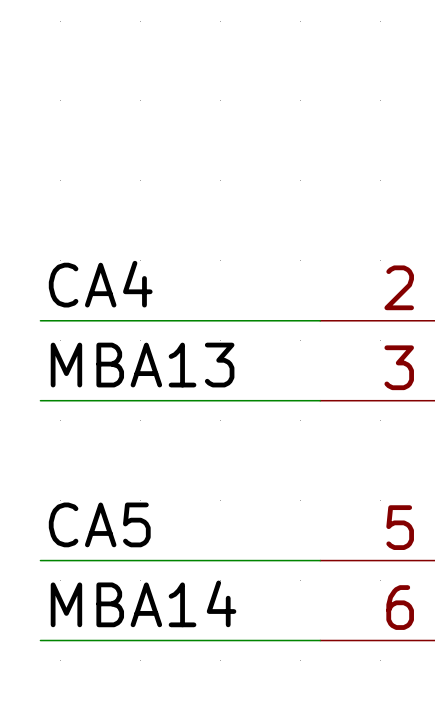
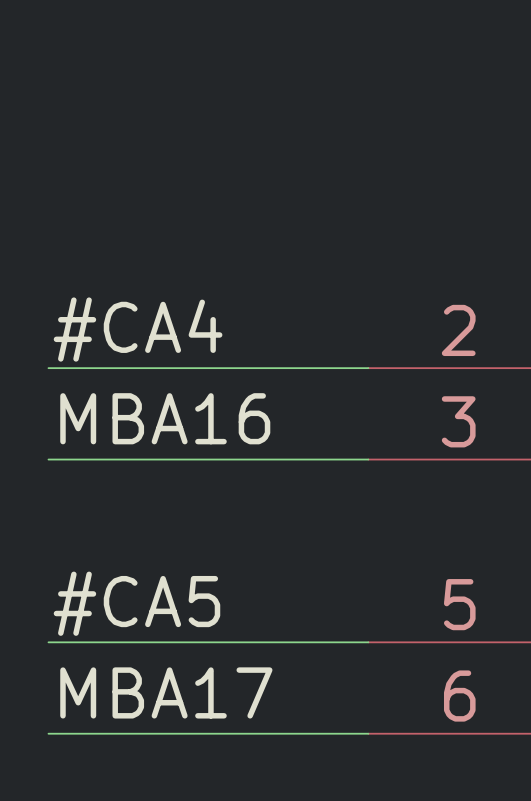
label: CA4 (100, 284) -> #CA4 (138, 329)
label: MBA13 (142, 365) -> MBA16 (165, 418)
label: CA5 (99, 524) -> #CA5 (136, 603)
label: MBA14 (143, 603) -> MBA17 (166, 692)

